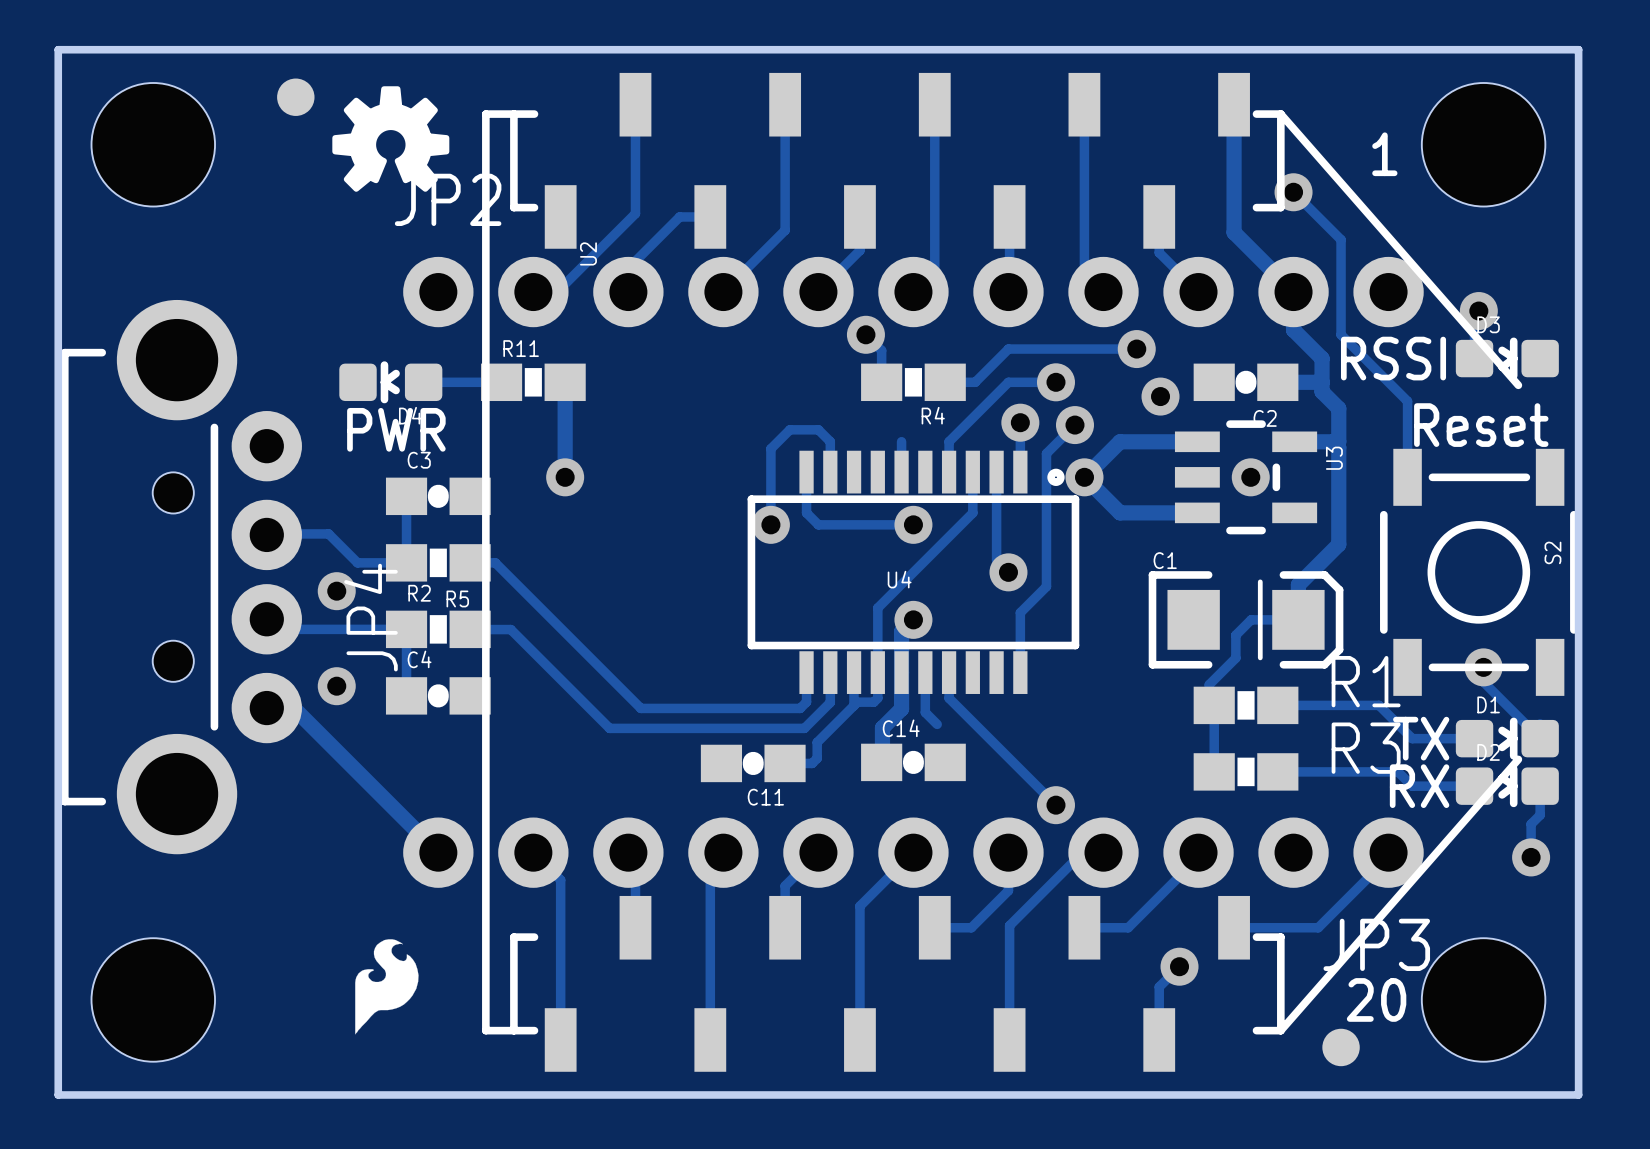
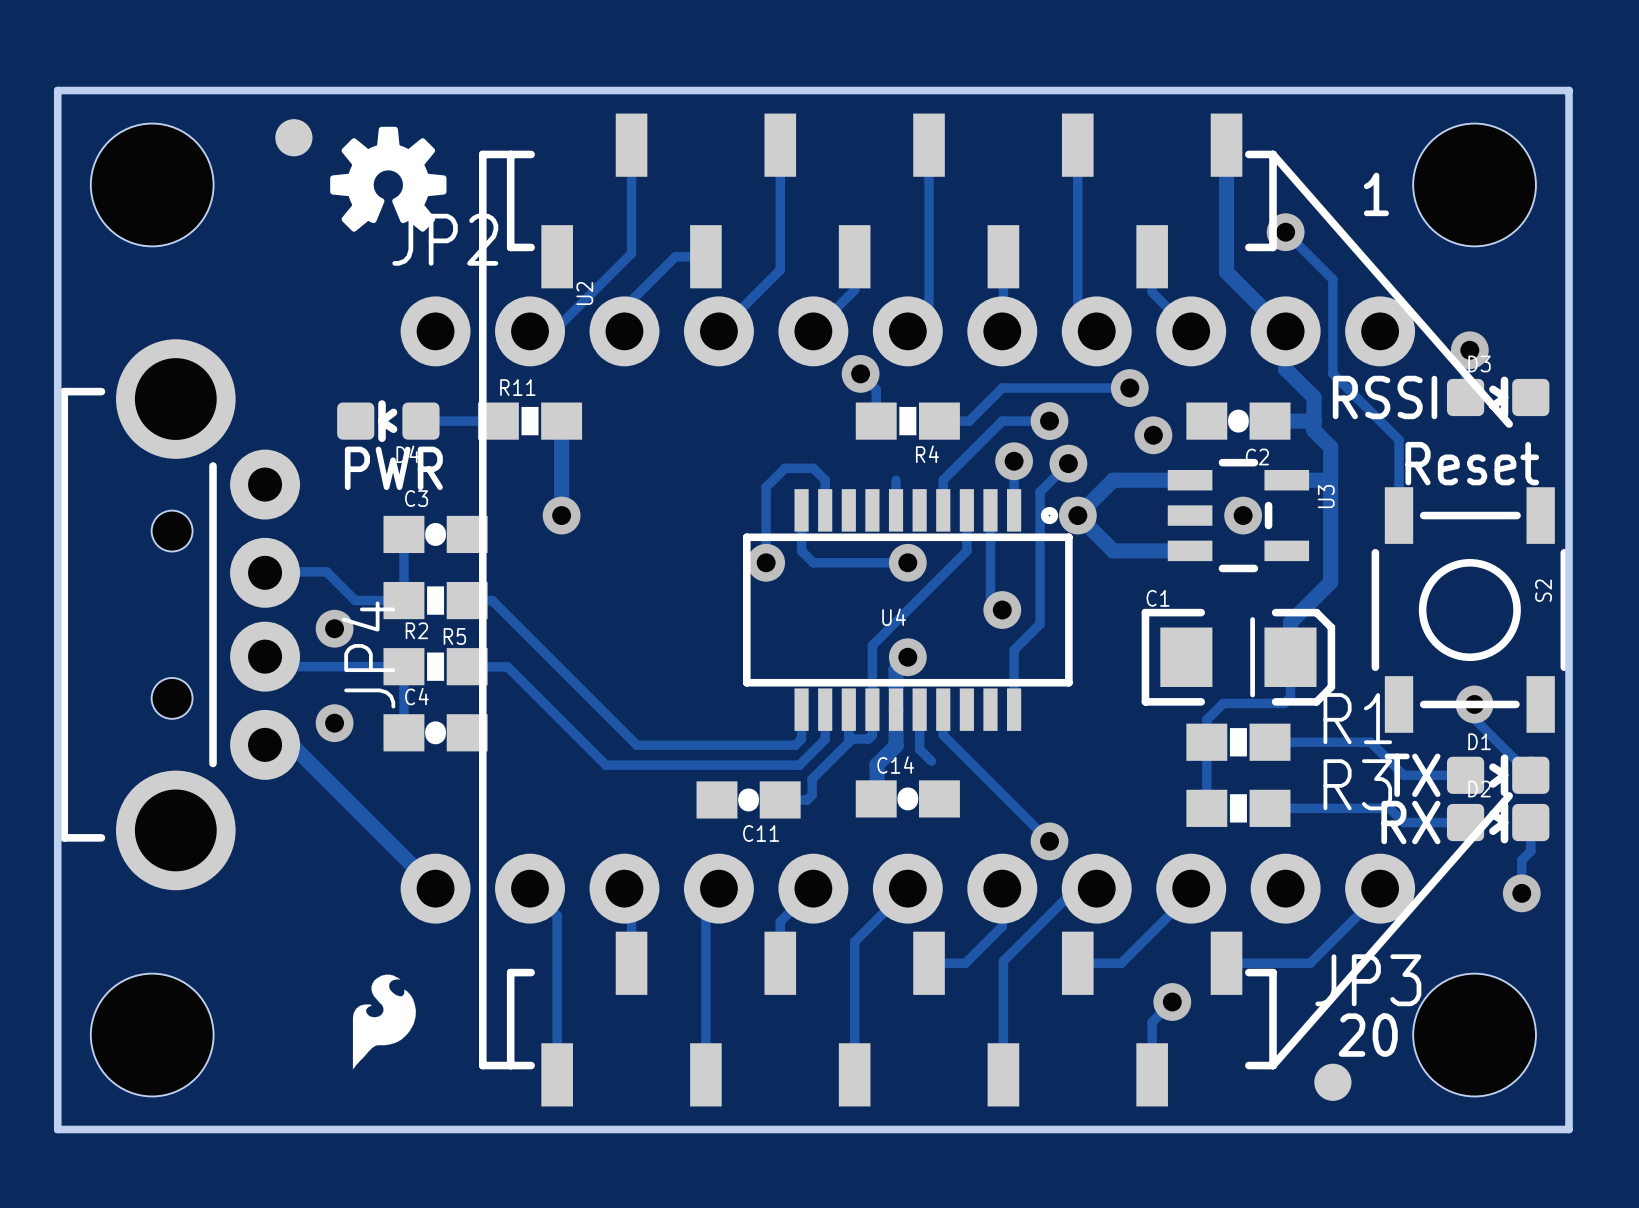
track: (1298, 619) (1251, 619) (1235, 635) (1235, 658) (1209, 684) (1209, 700) (1214, 705) -> (1290, 657) (1290, 697) (1284, 703) (1223, 703) (1207, 719) (1207, 742)

